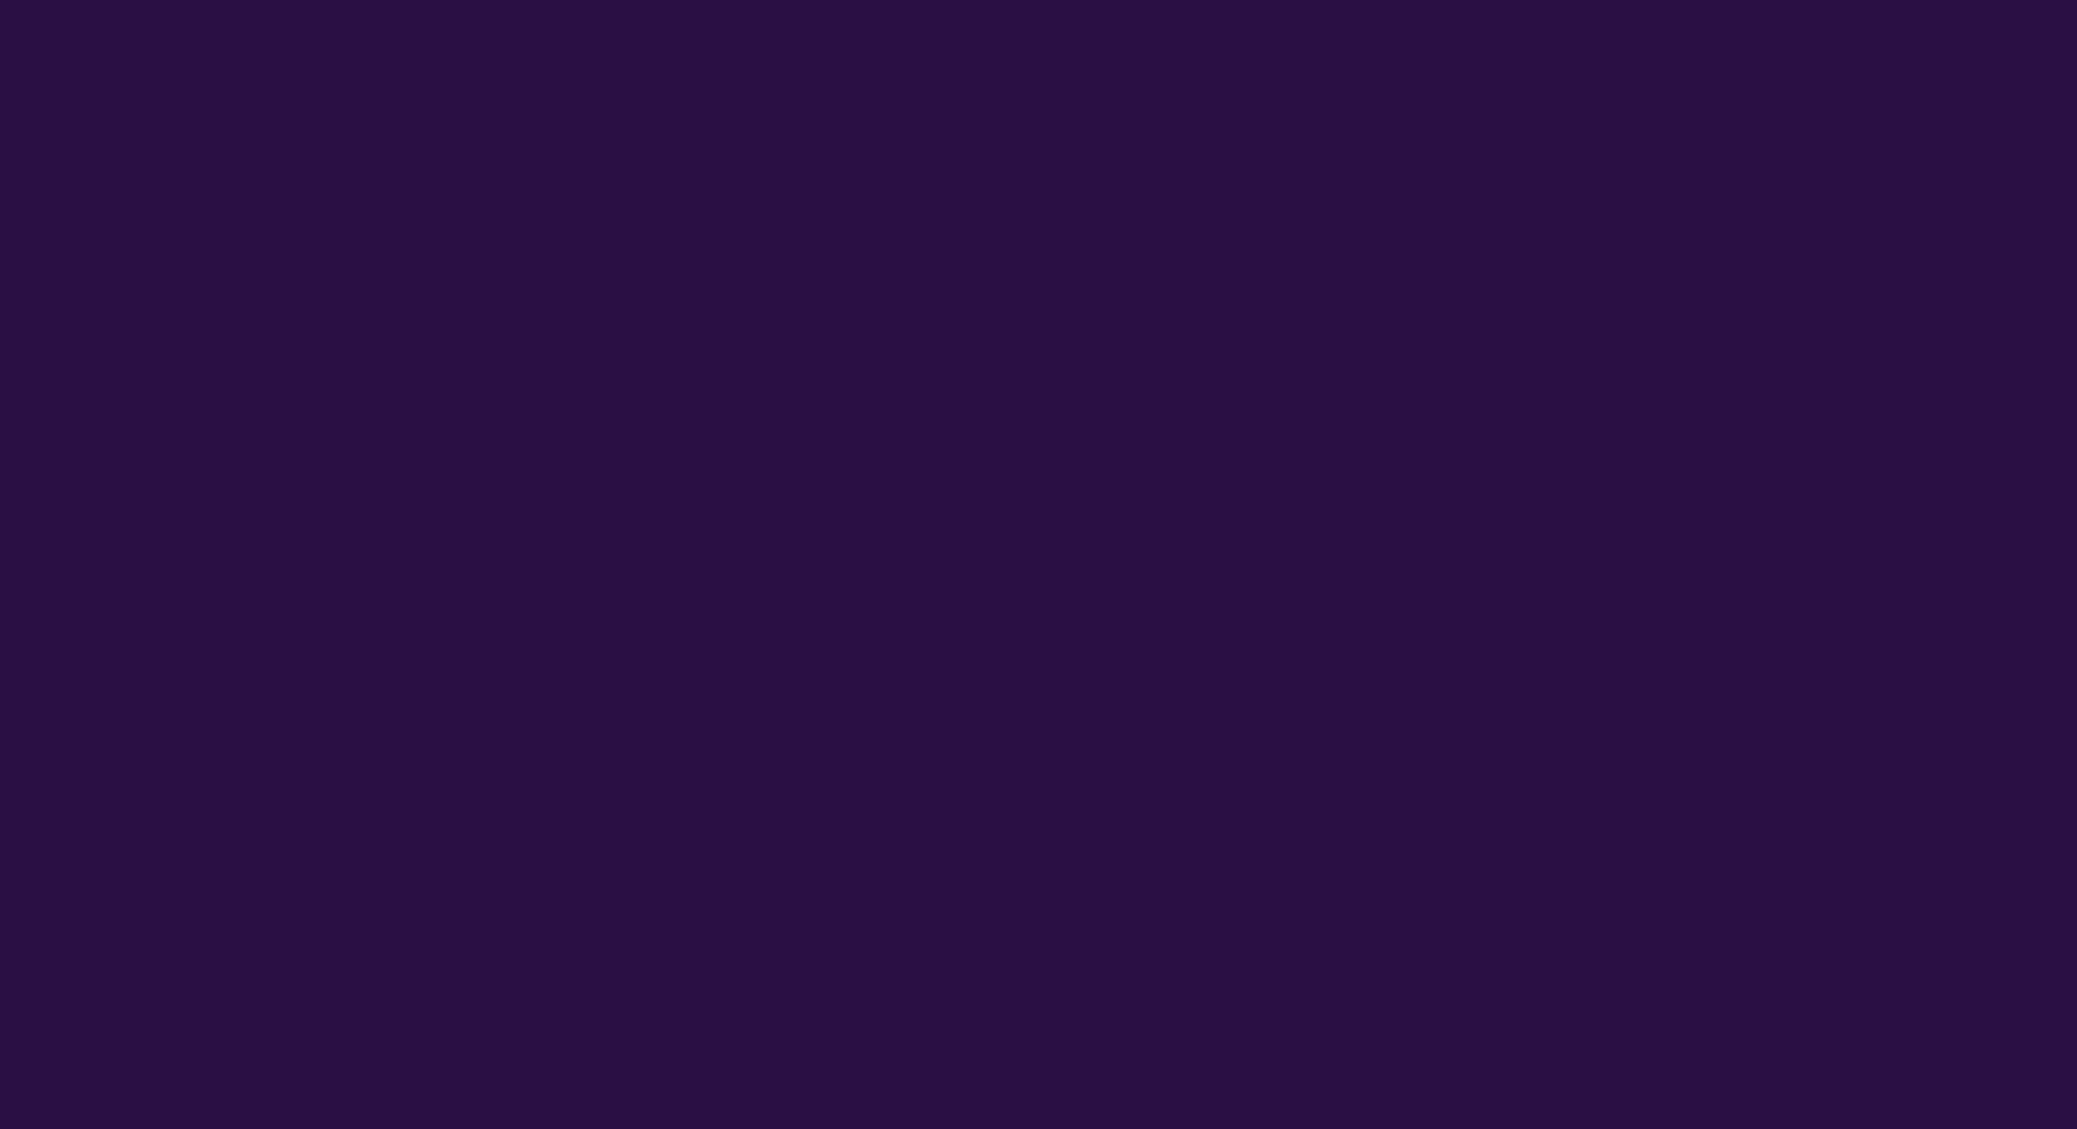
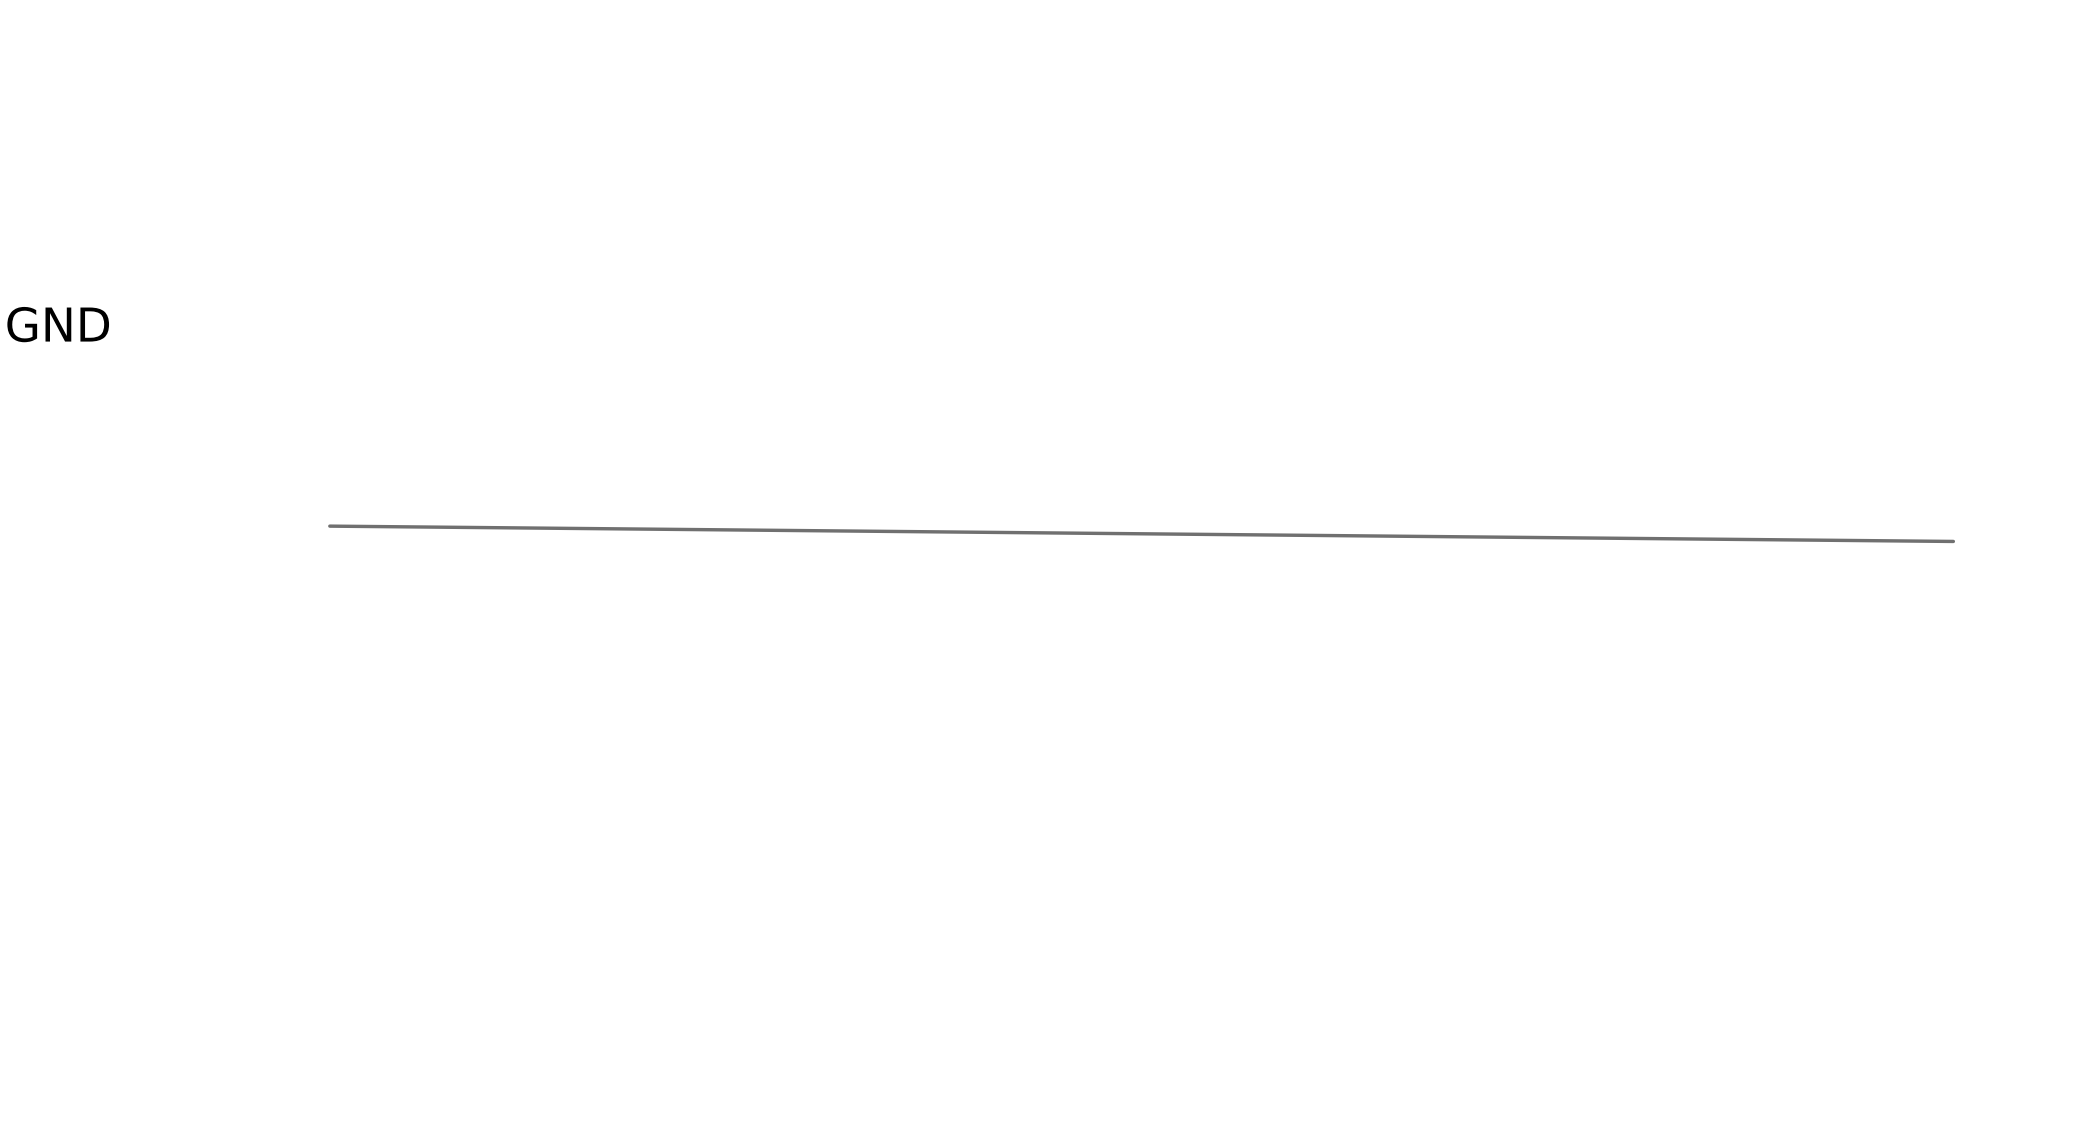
text: none -> GND (58, 324)
line: none -> (329, 526) (1953, 541)

